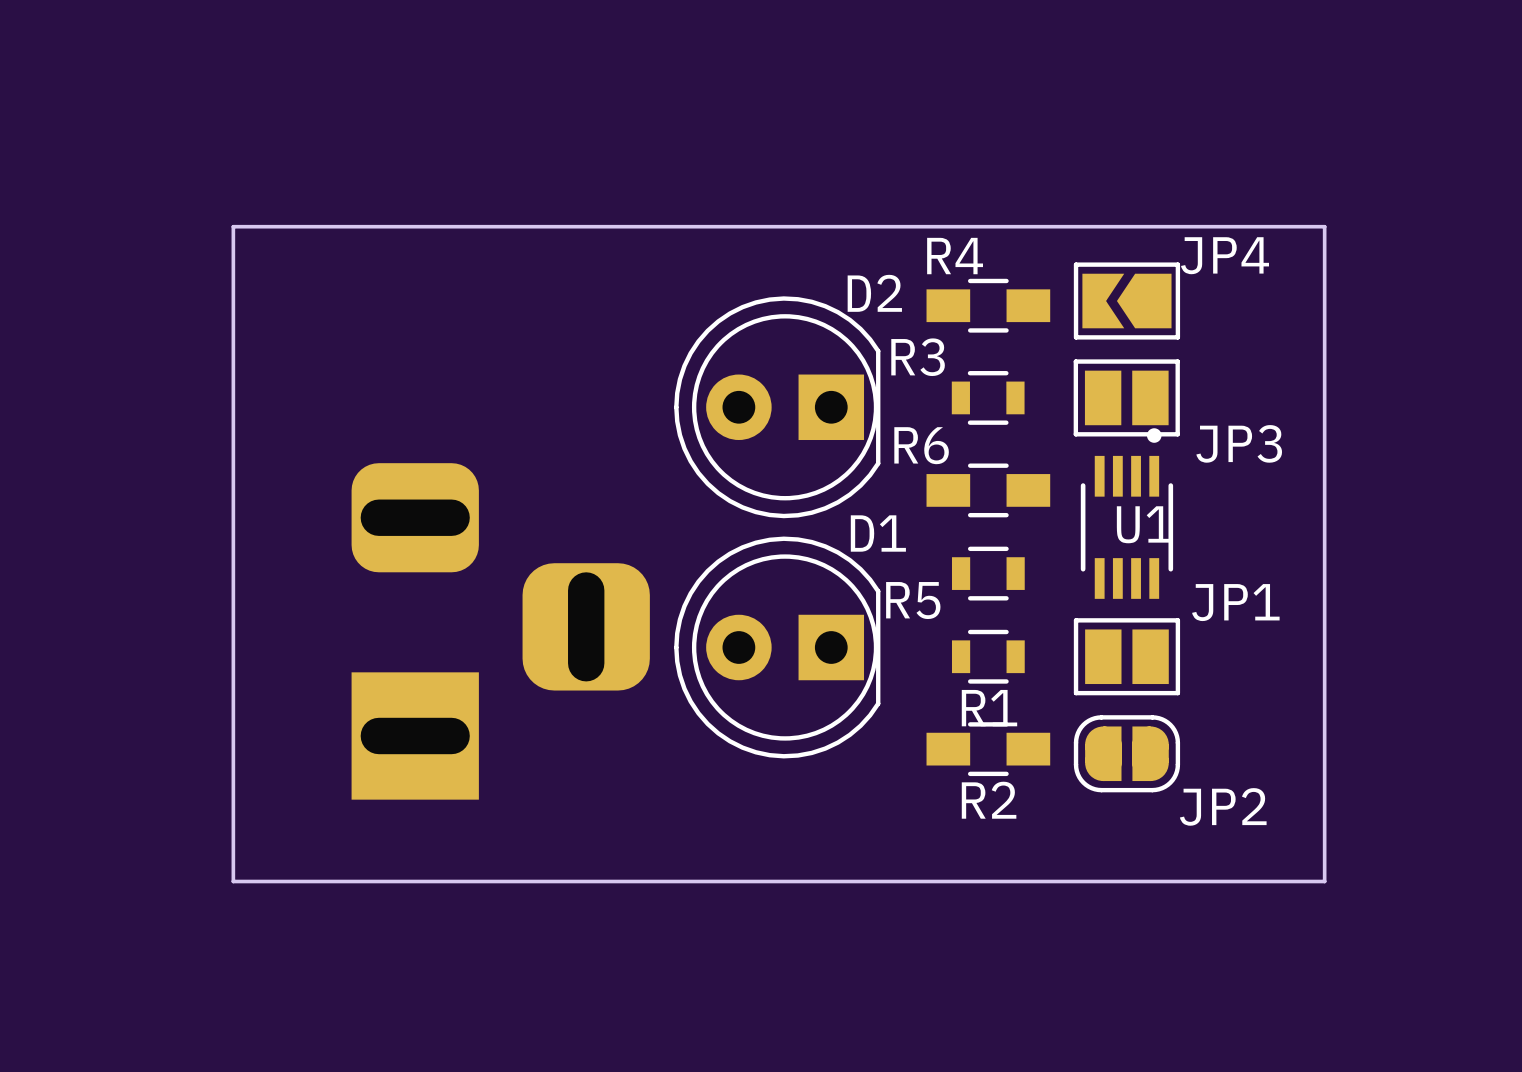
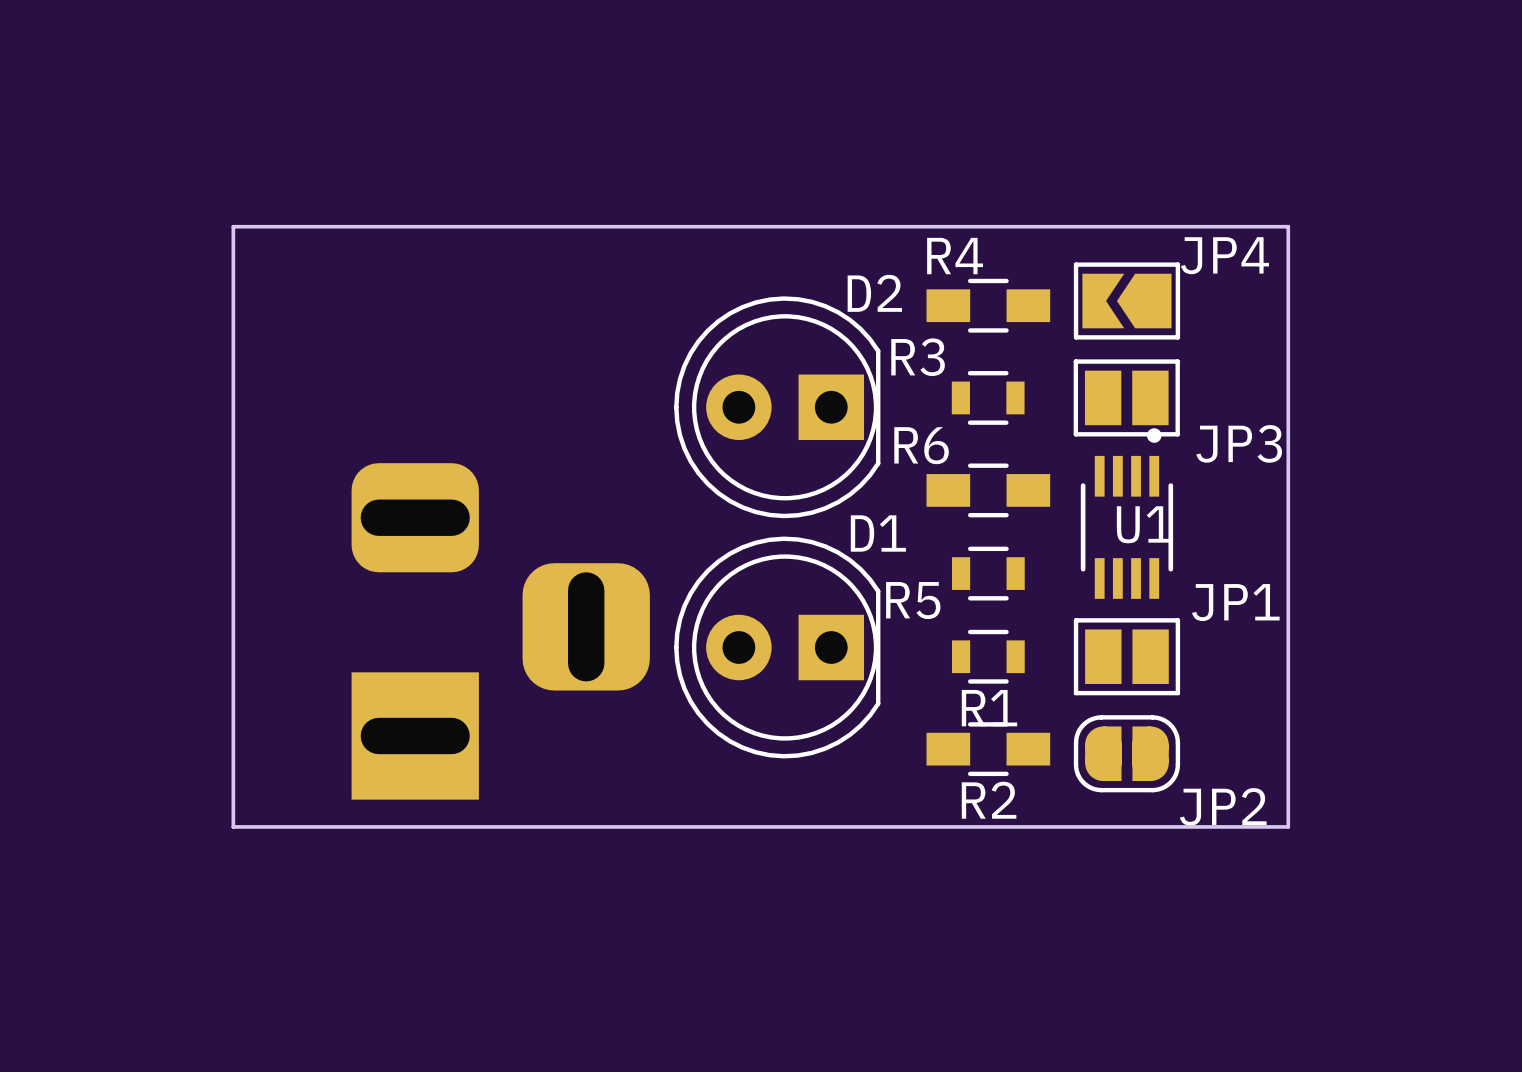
board edge: (1288, 226) (1324, 226) (1324, 881) (233, 881) (233, 826) -> (1288, 226) (1288, 826) (233, 826)

